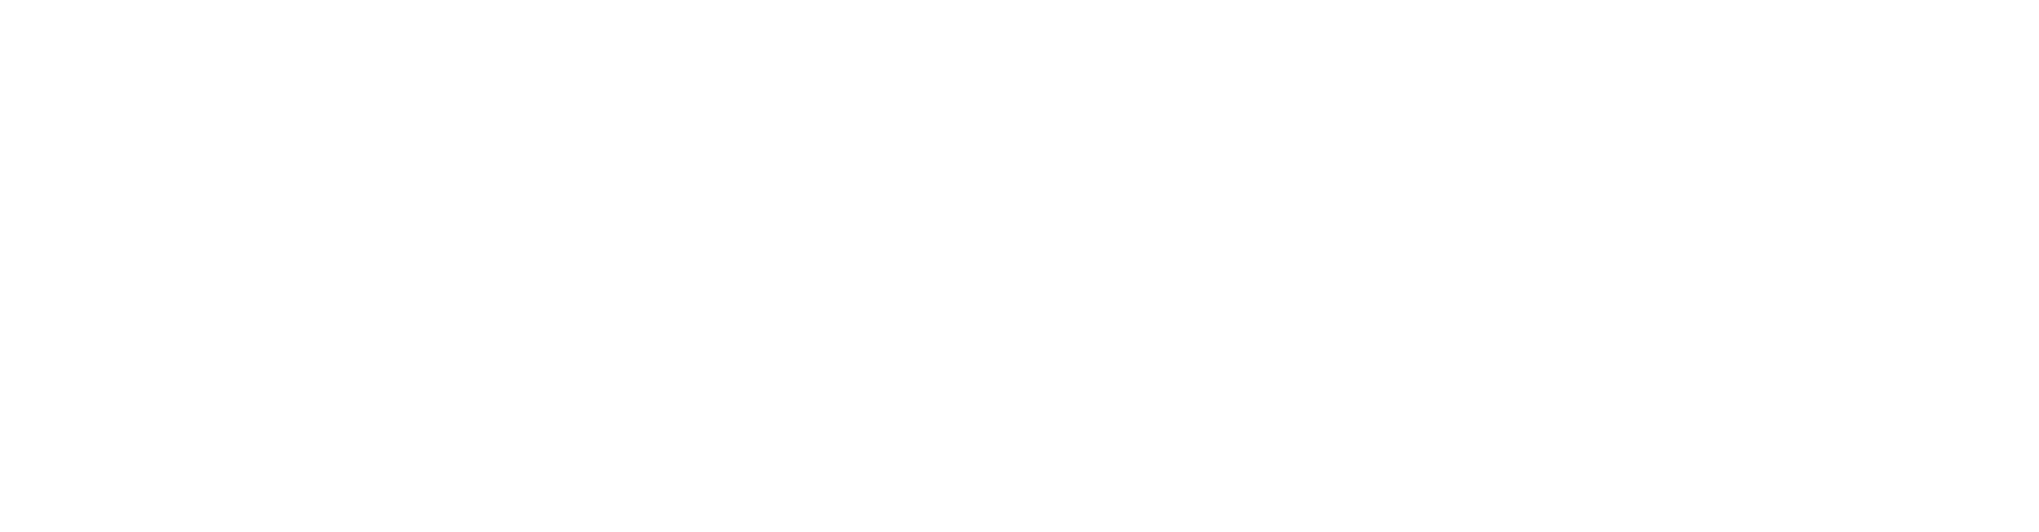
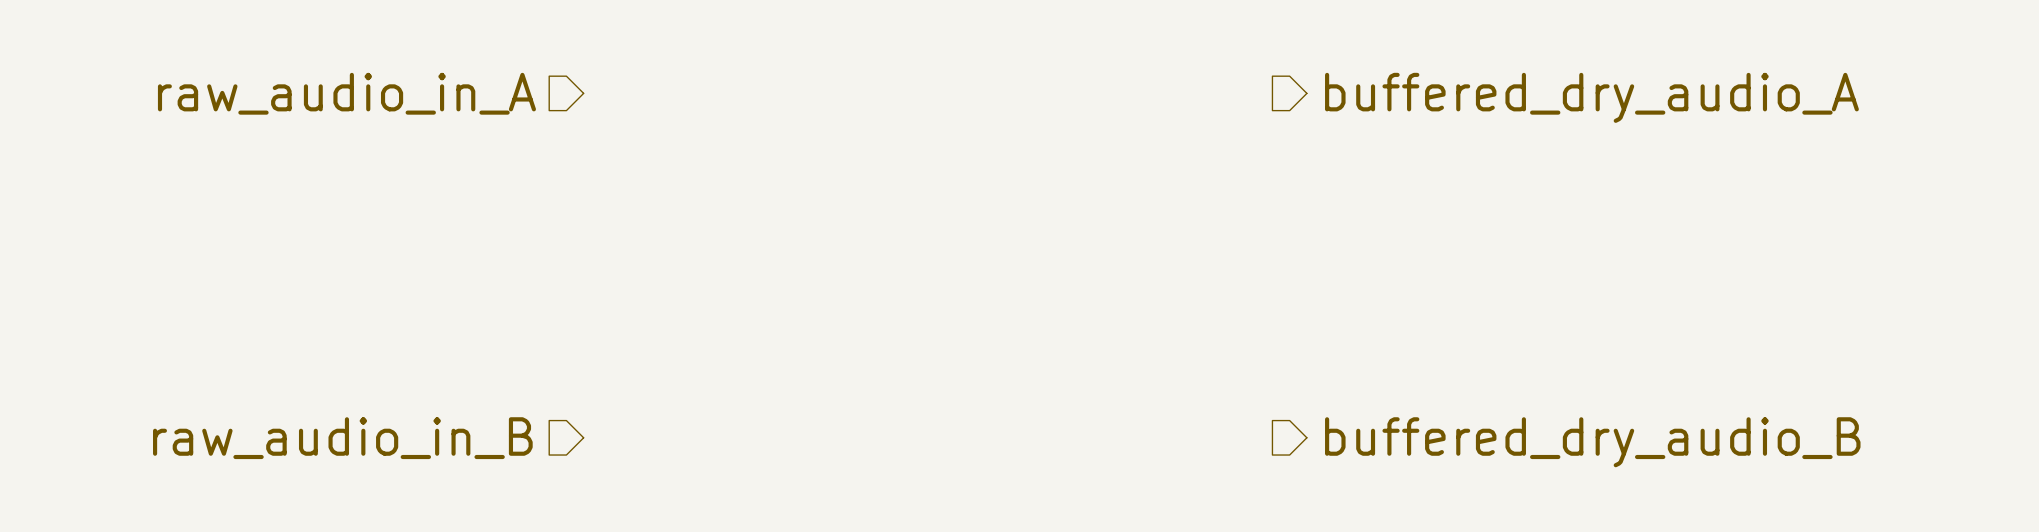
hierarchical label: none -> raw_audio_in_A (346, 93)
hierarchical label: none -> buffered_dry_audio_A (1591, 97)
hierarchical label: none -> raw_audio_in_B (342, 438)
hierarchical label: none -> buffered_dry_audio_B (1592, 442)

